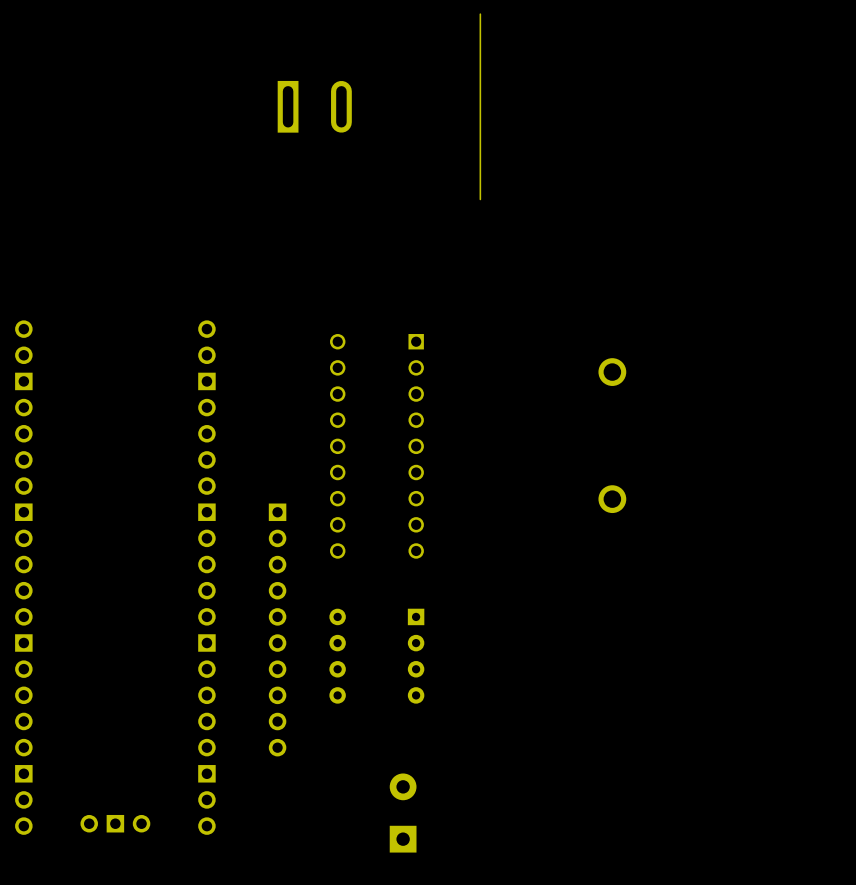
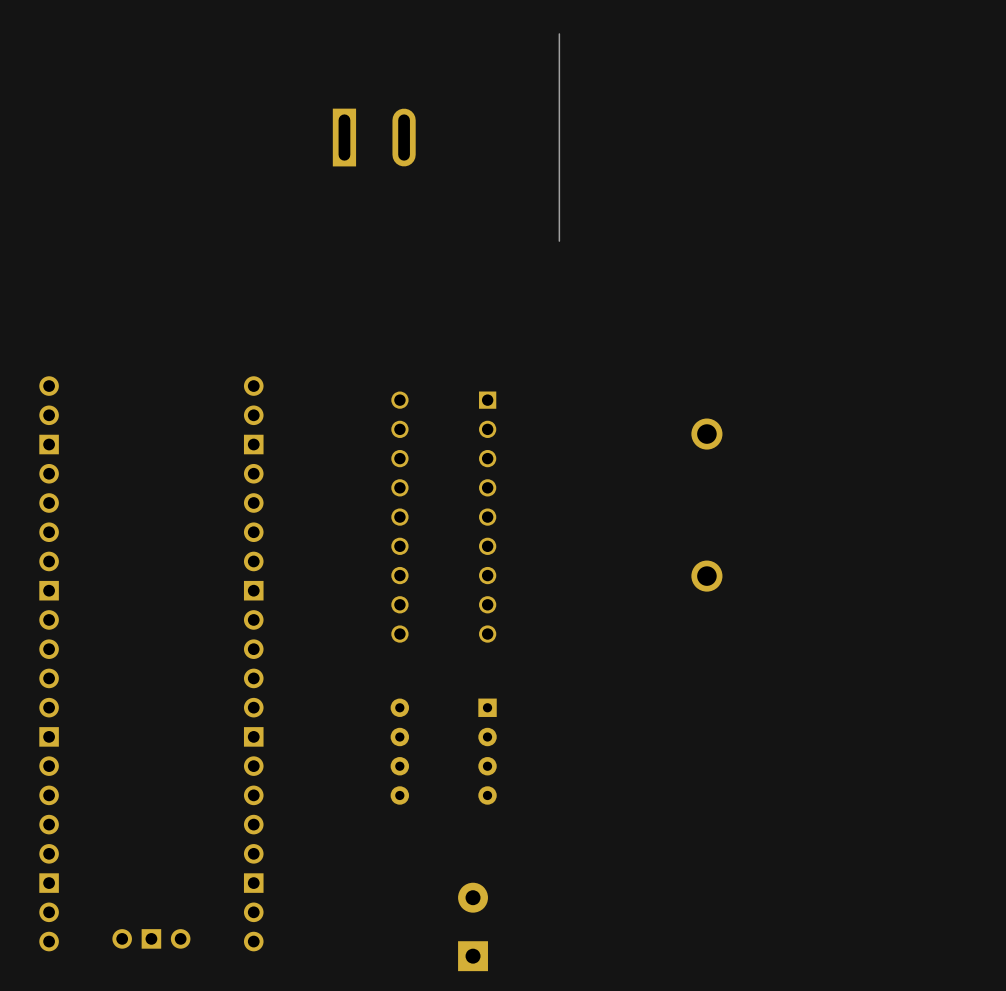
part: (277, 629) -> none

